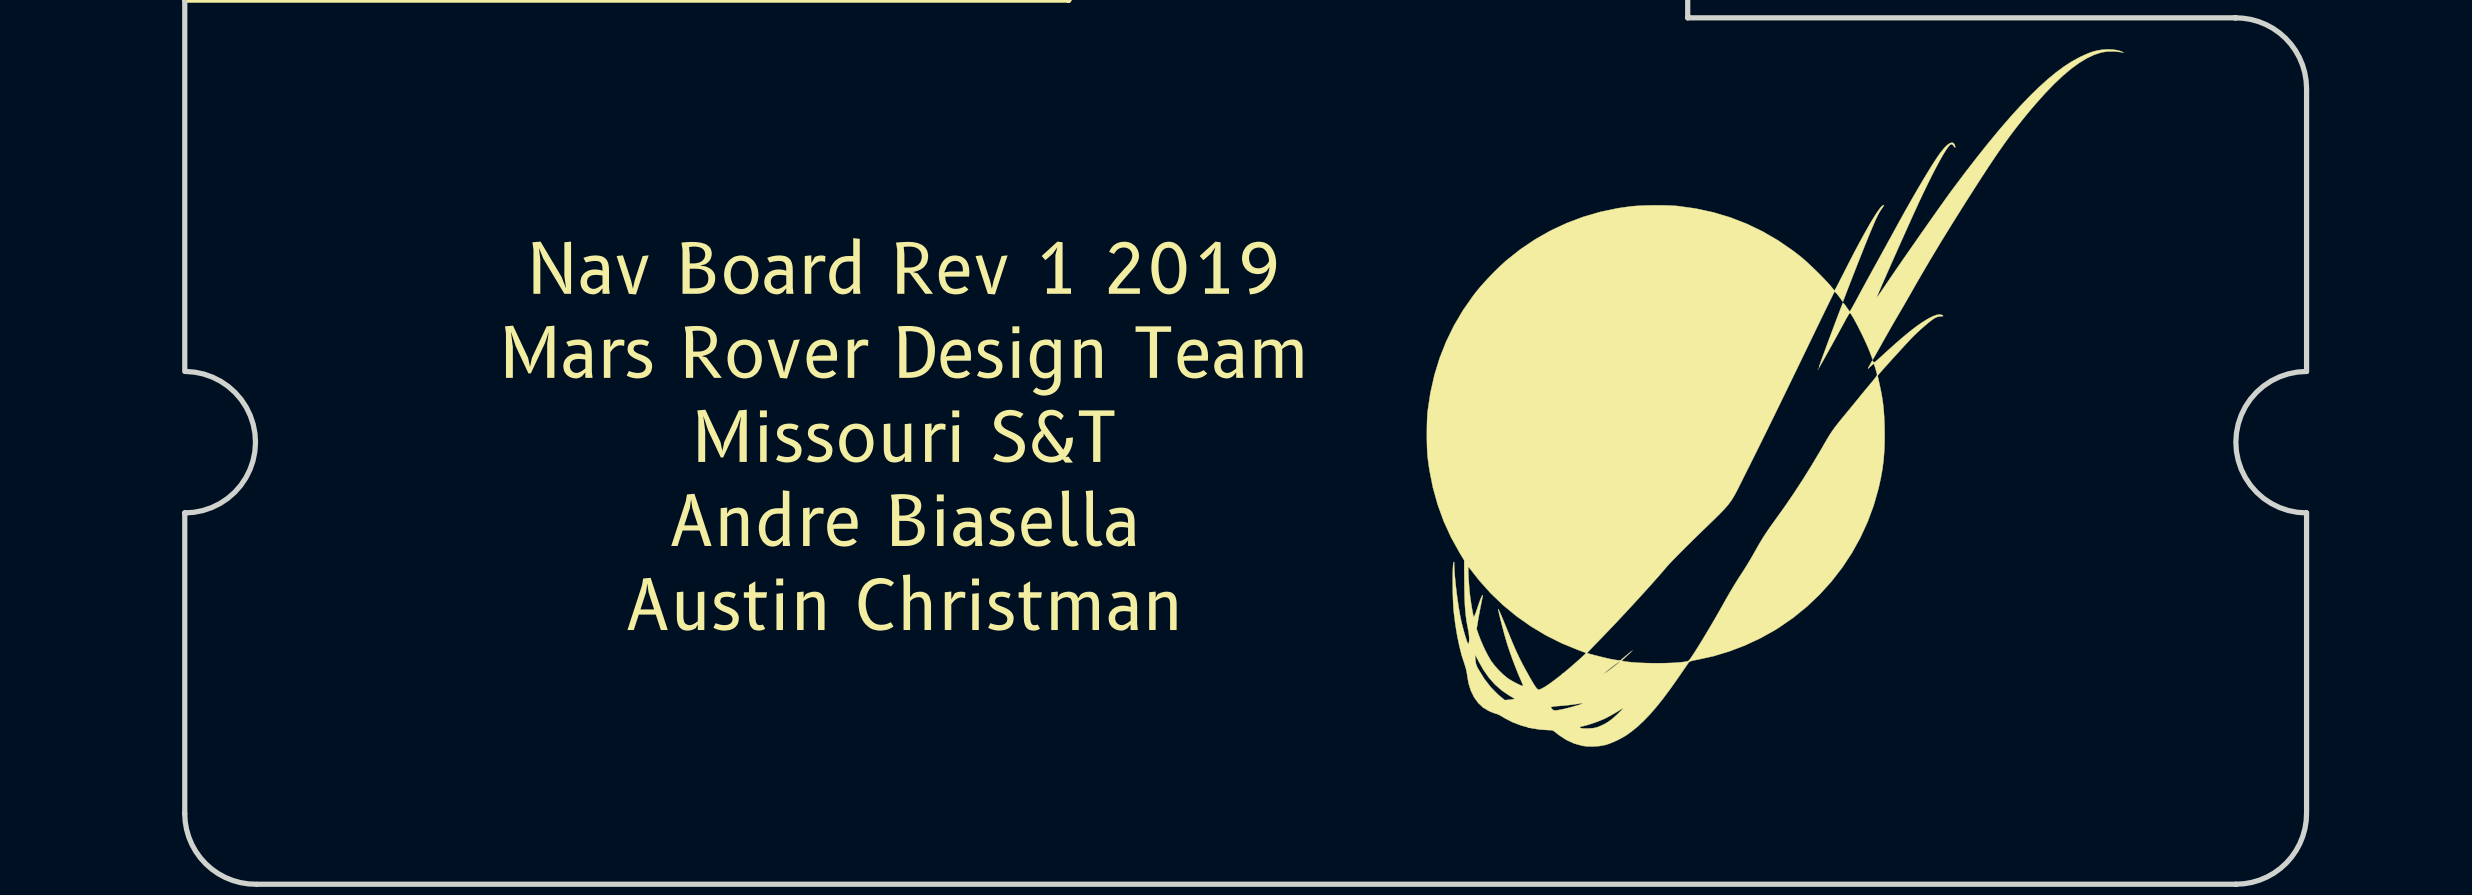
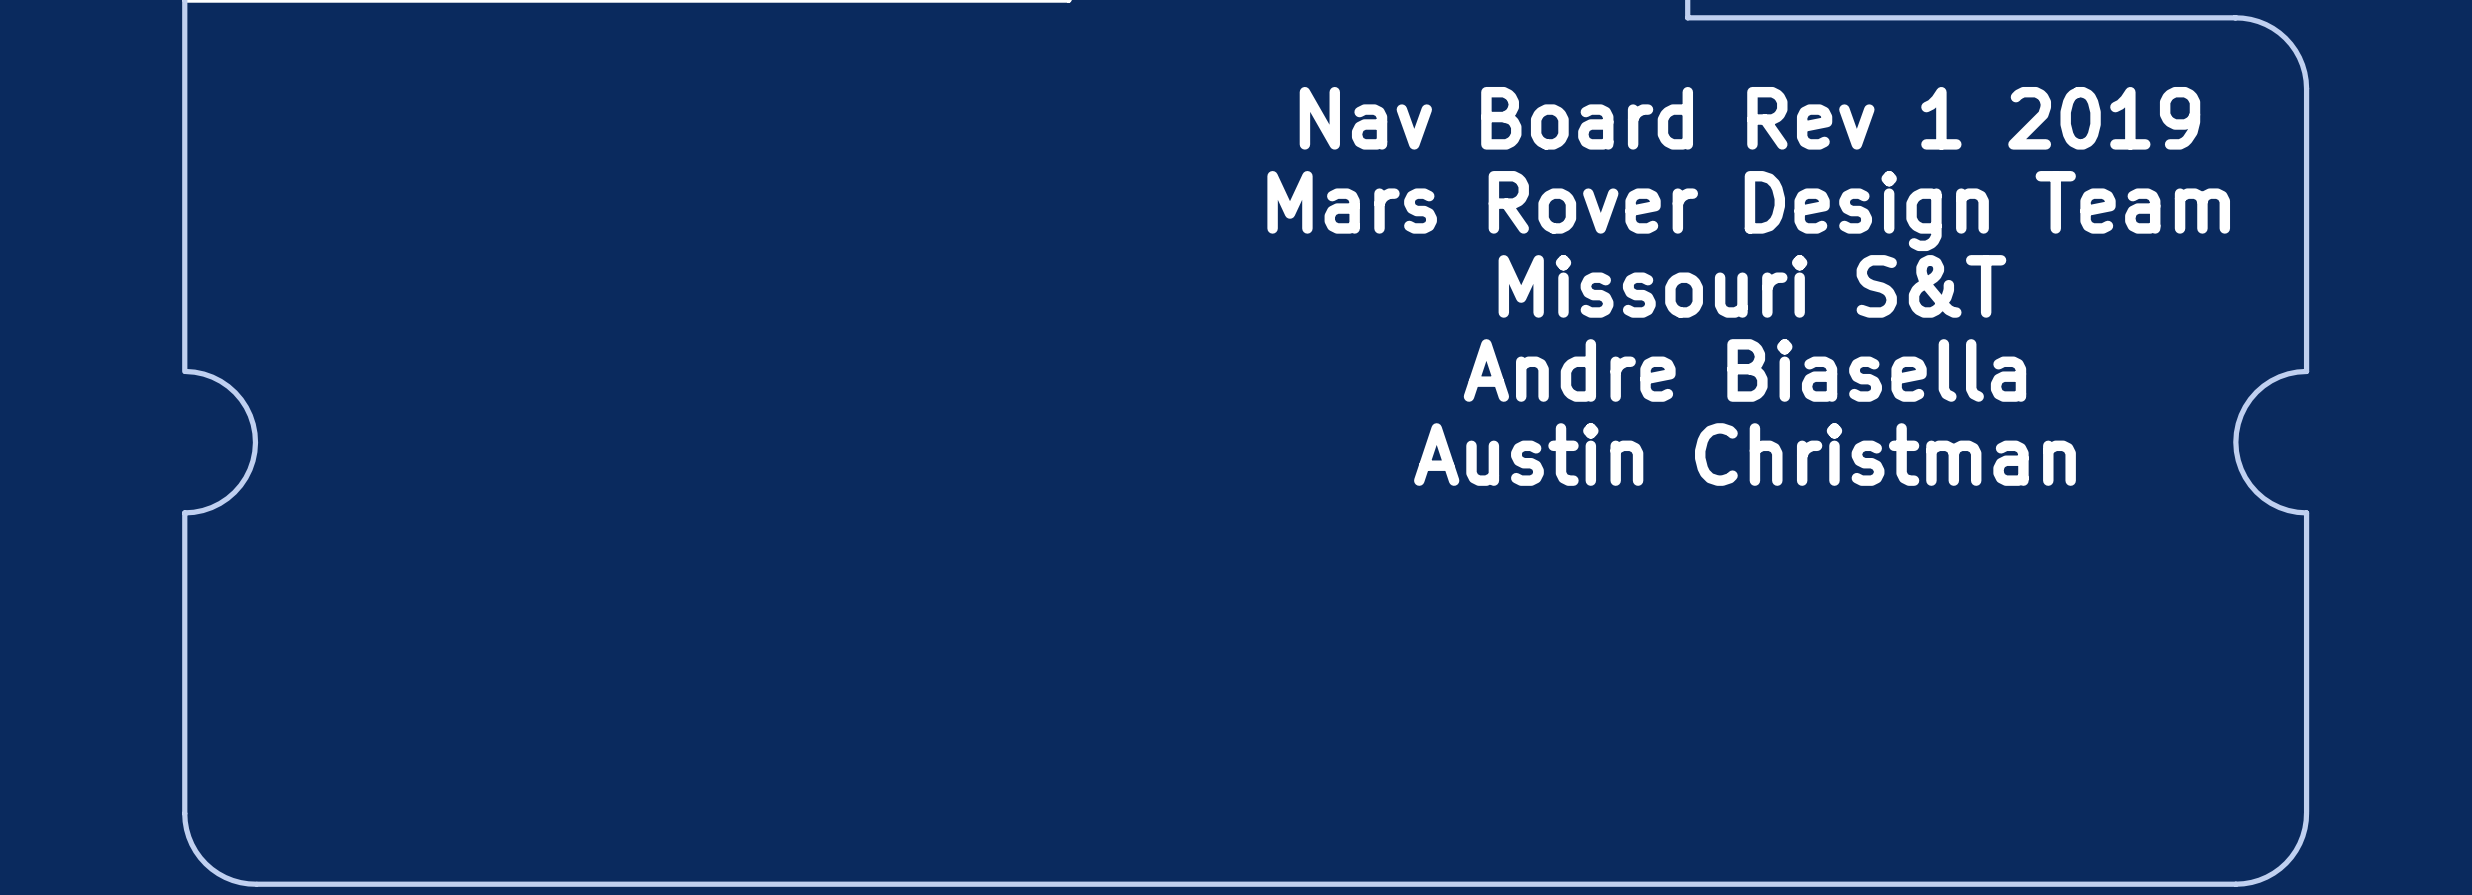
drawing: [1426, 49, 2124, 747] -> none
text position: Nav Board Rev 1 2019 (904, 266) -> Nav Board Rev 1 2019 (1749, 118)
text position: Mars Rover Design Team (903, 360) -> Mars Rover Design Team (1748, 211)
text position: Missouri S&T (905, 436) -> Missouri S&T (1752, 286)
text position: Andre Biasella (903, 518) -> Andre Biasella (1744, 370)
text position: Austin Christman (902, 602) -> Austin Christman (1744, 454)

